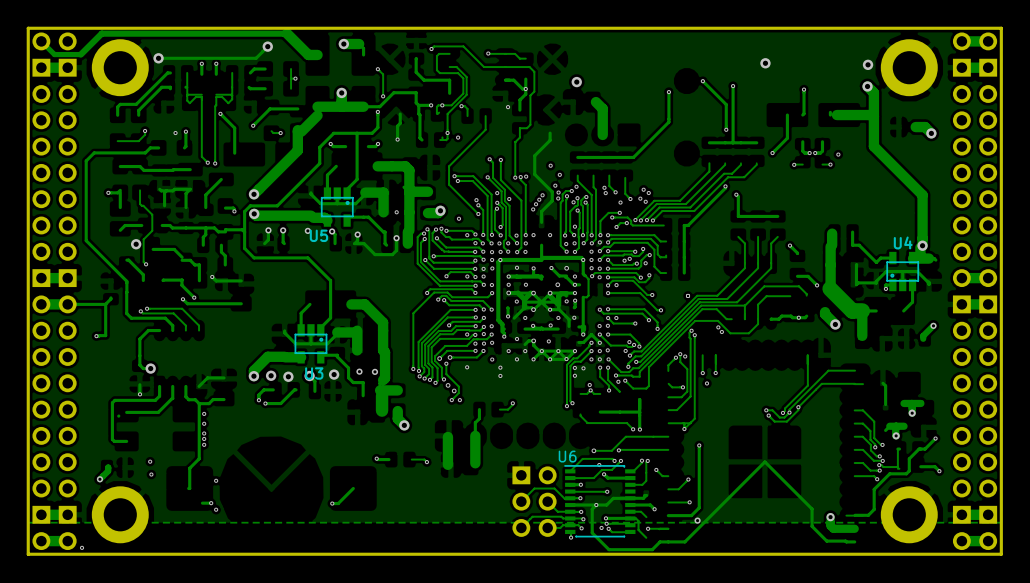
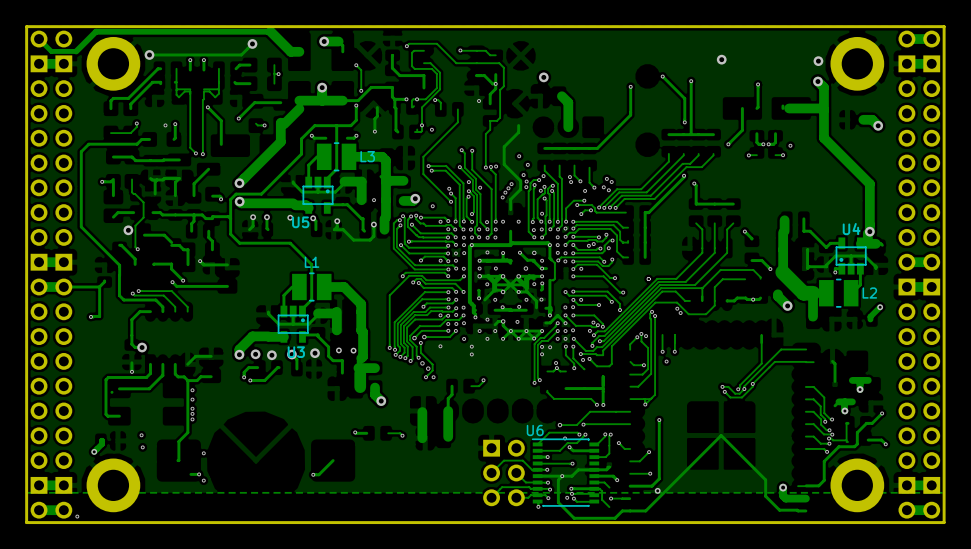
L3: none -> (336, 156)
L1: none -> (311, 287)
L2: none -> (838, 293)

